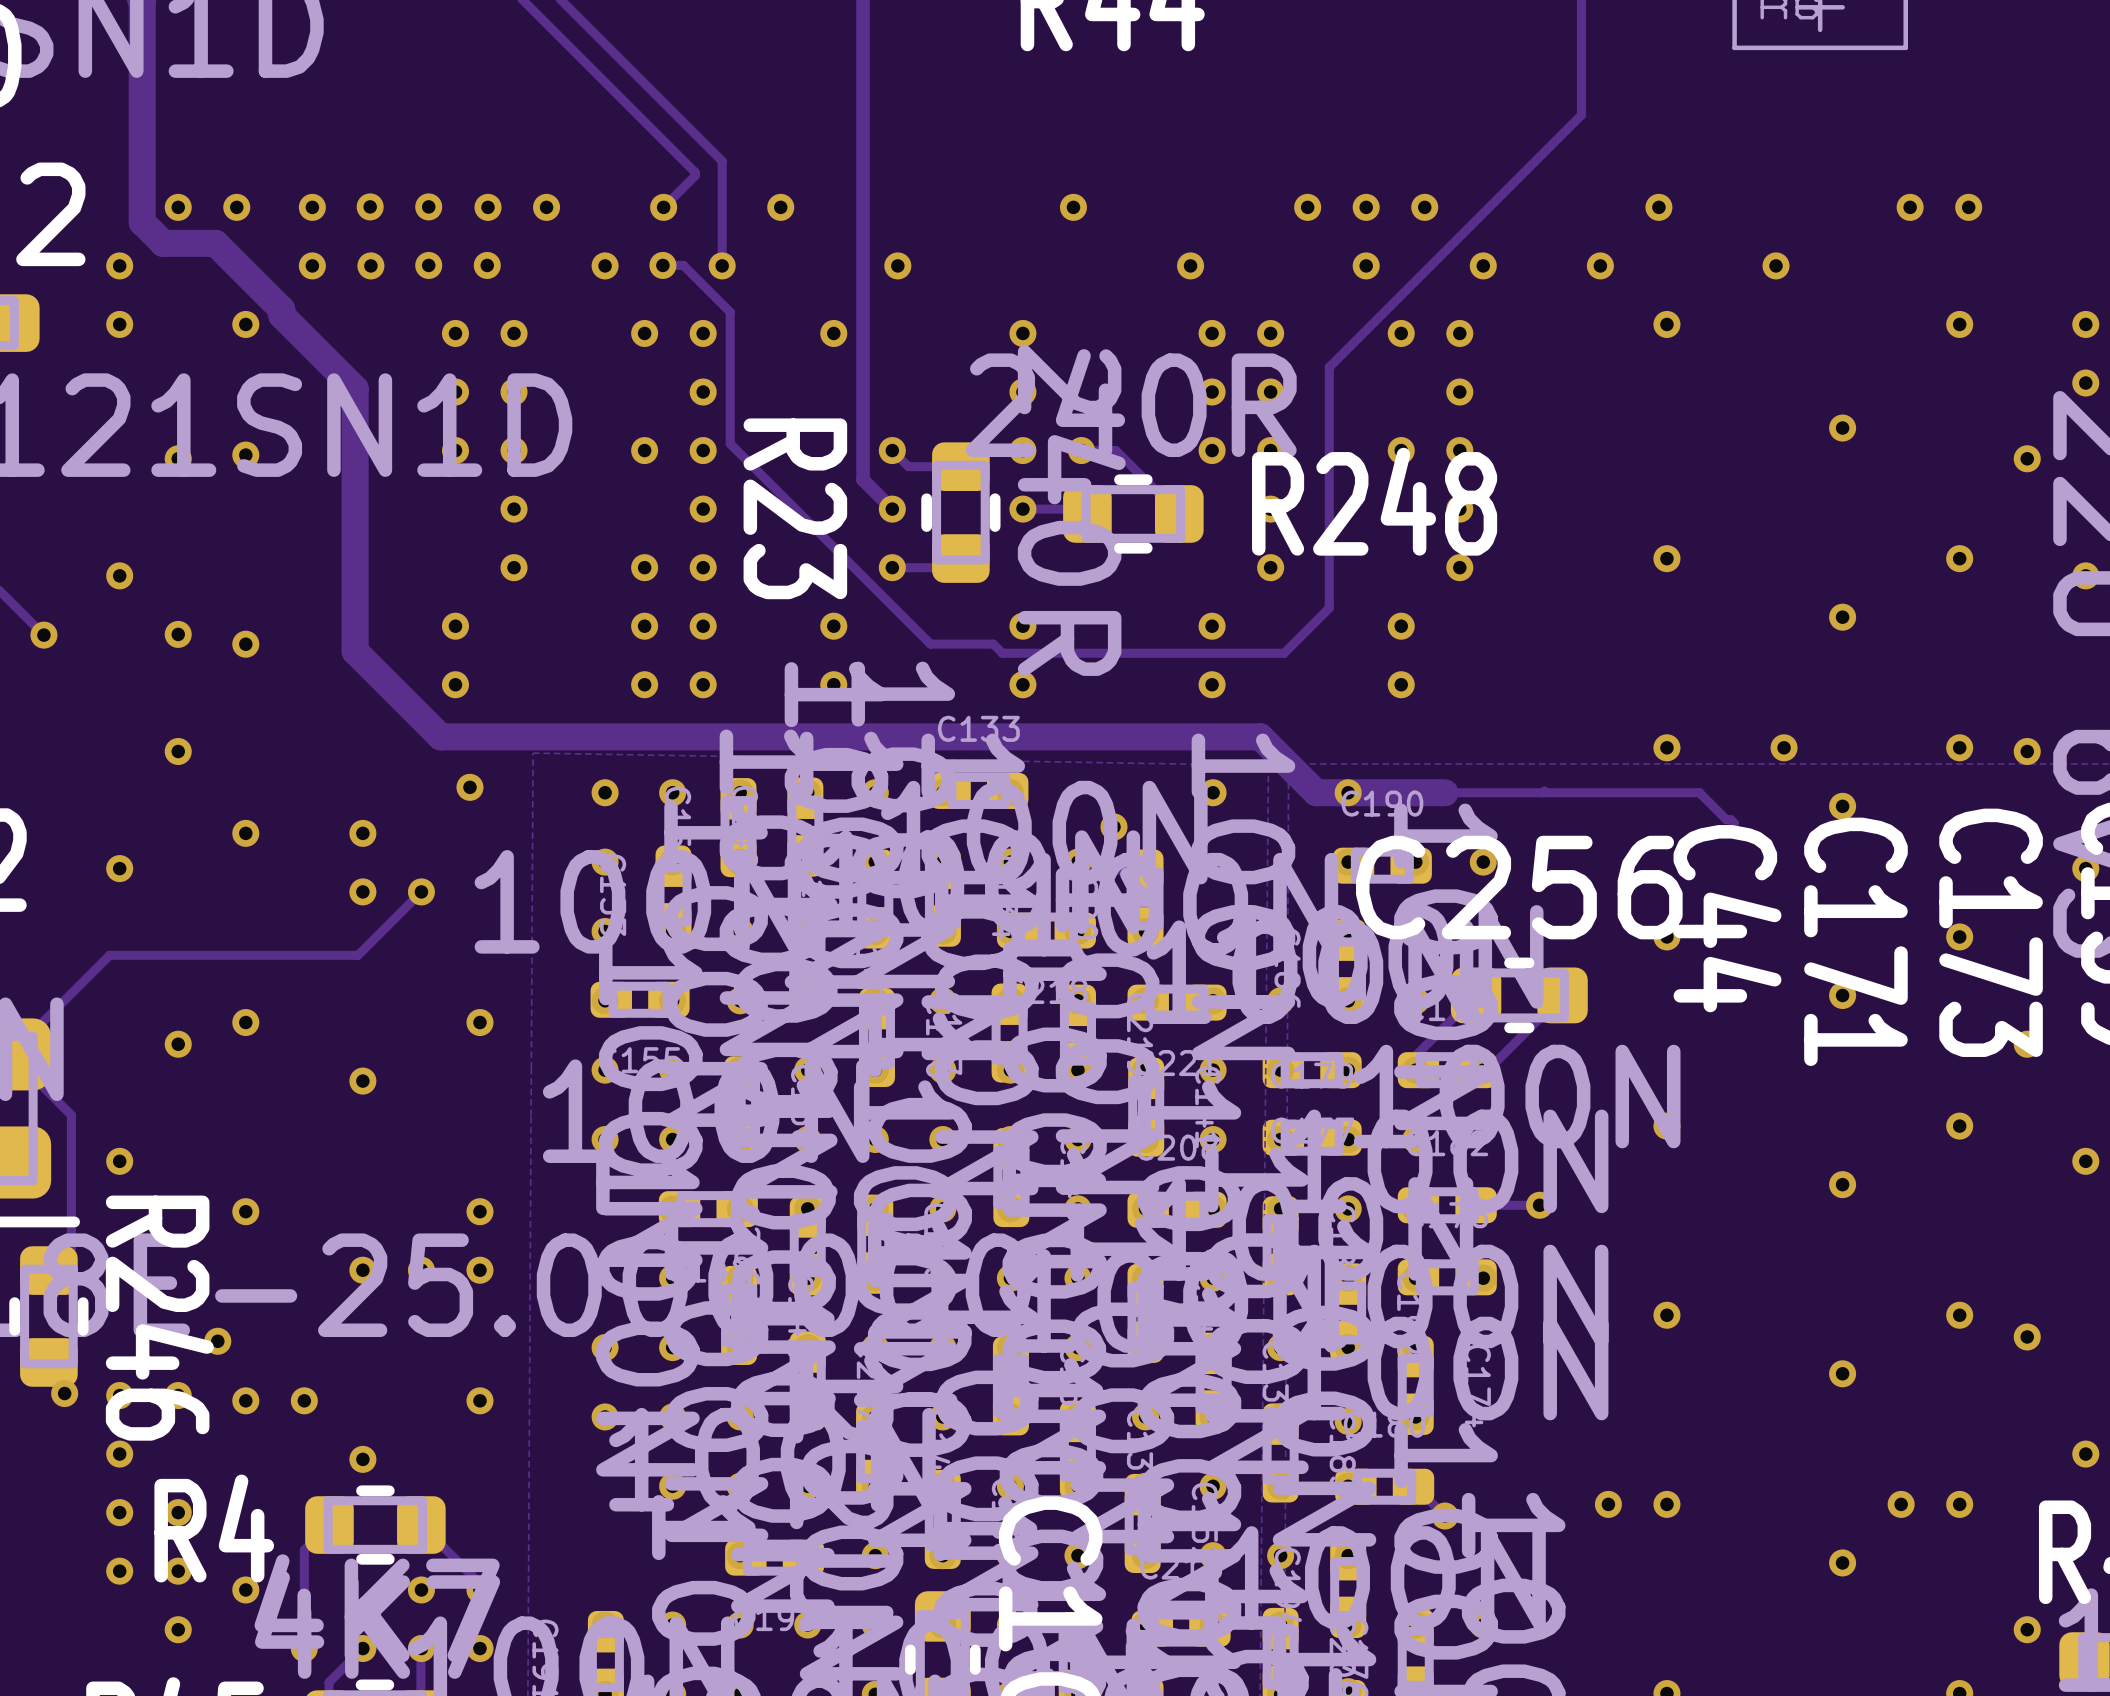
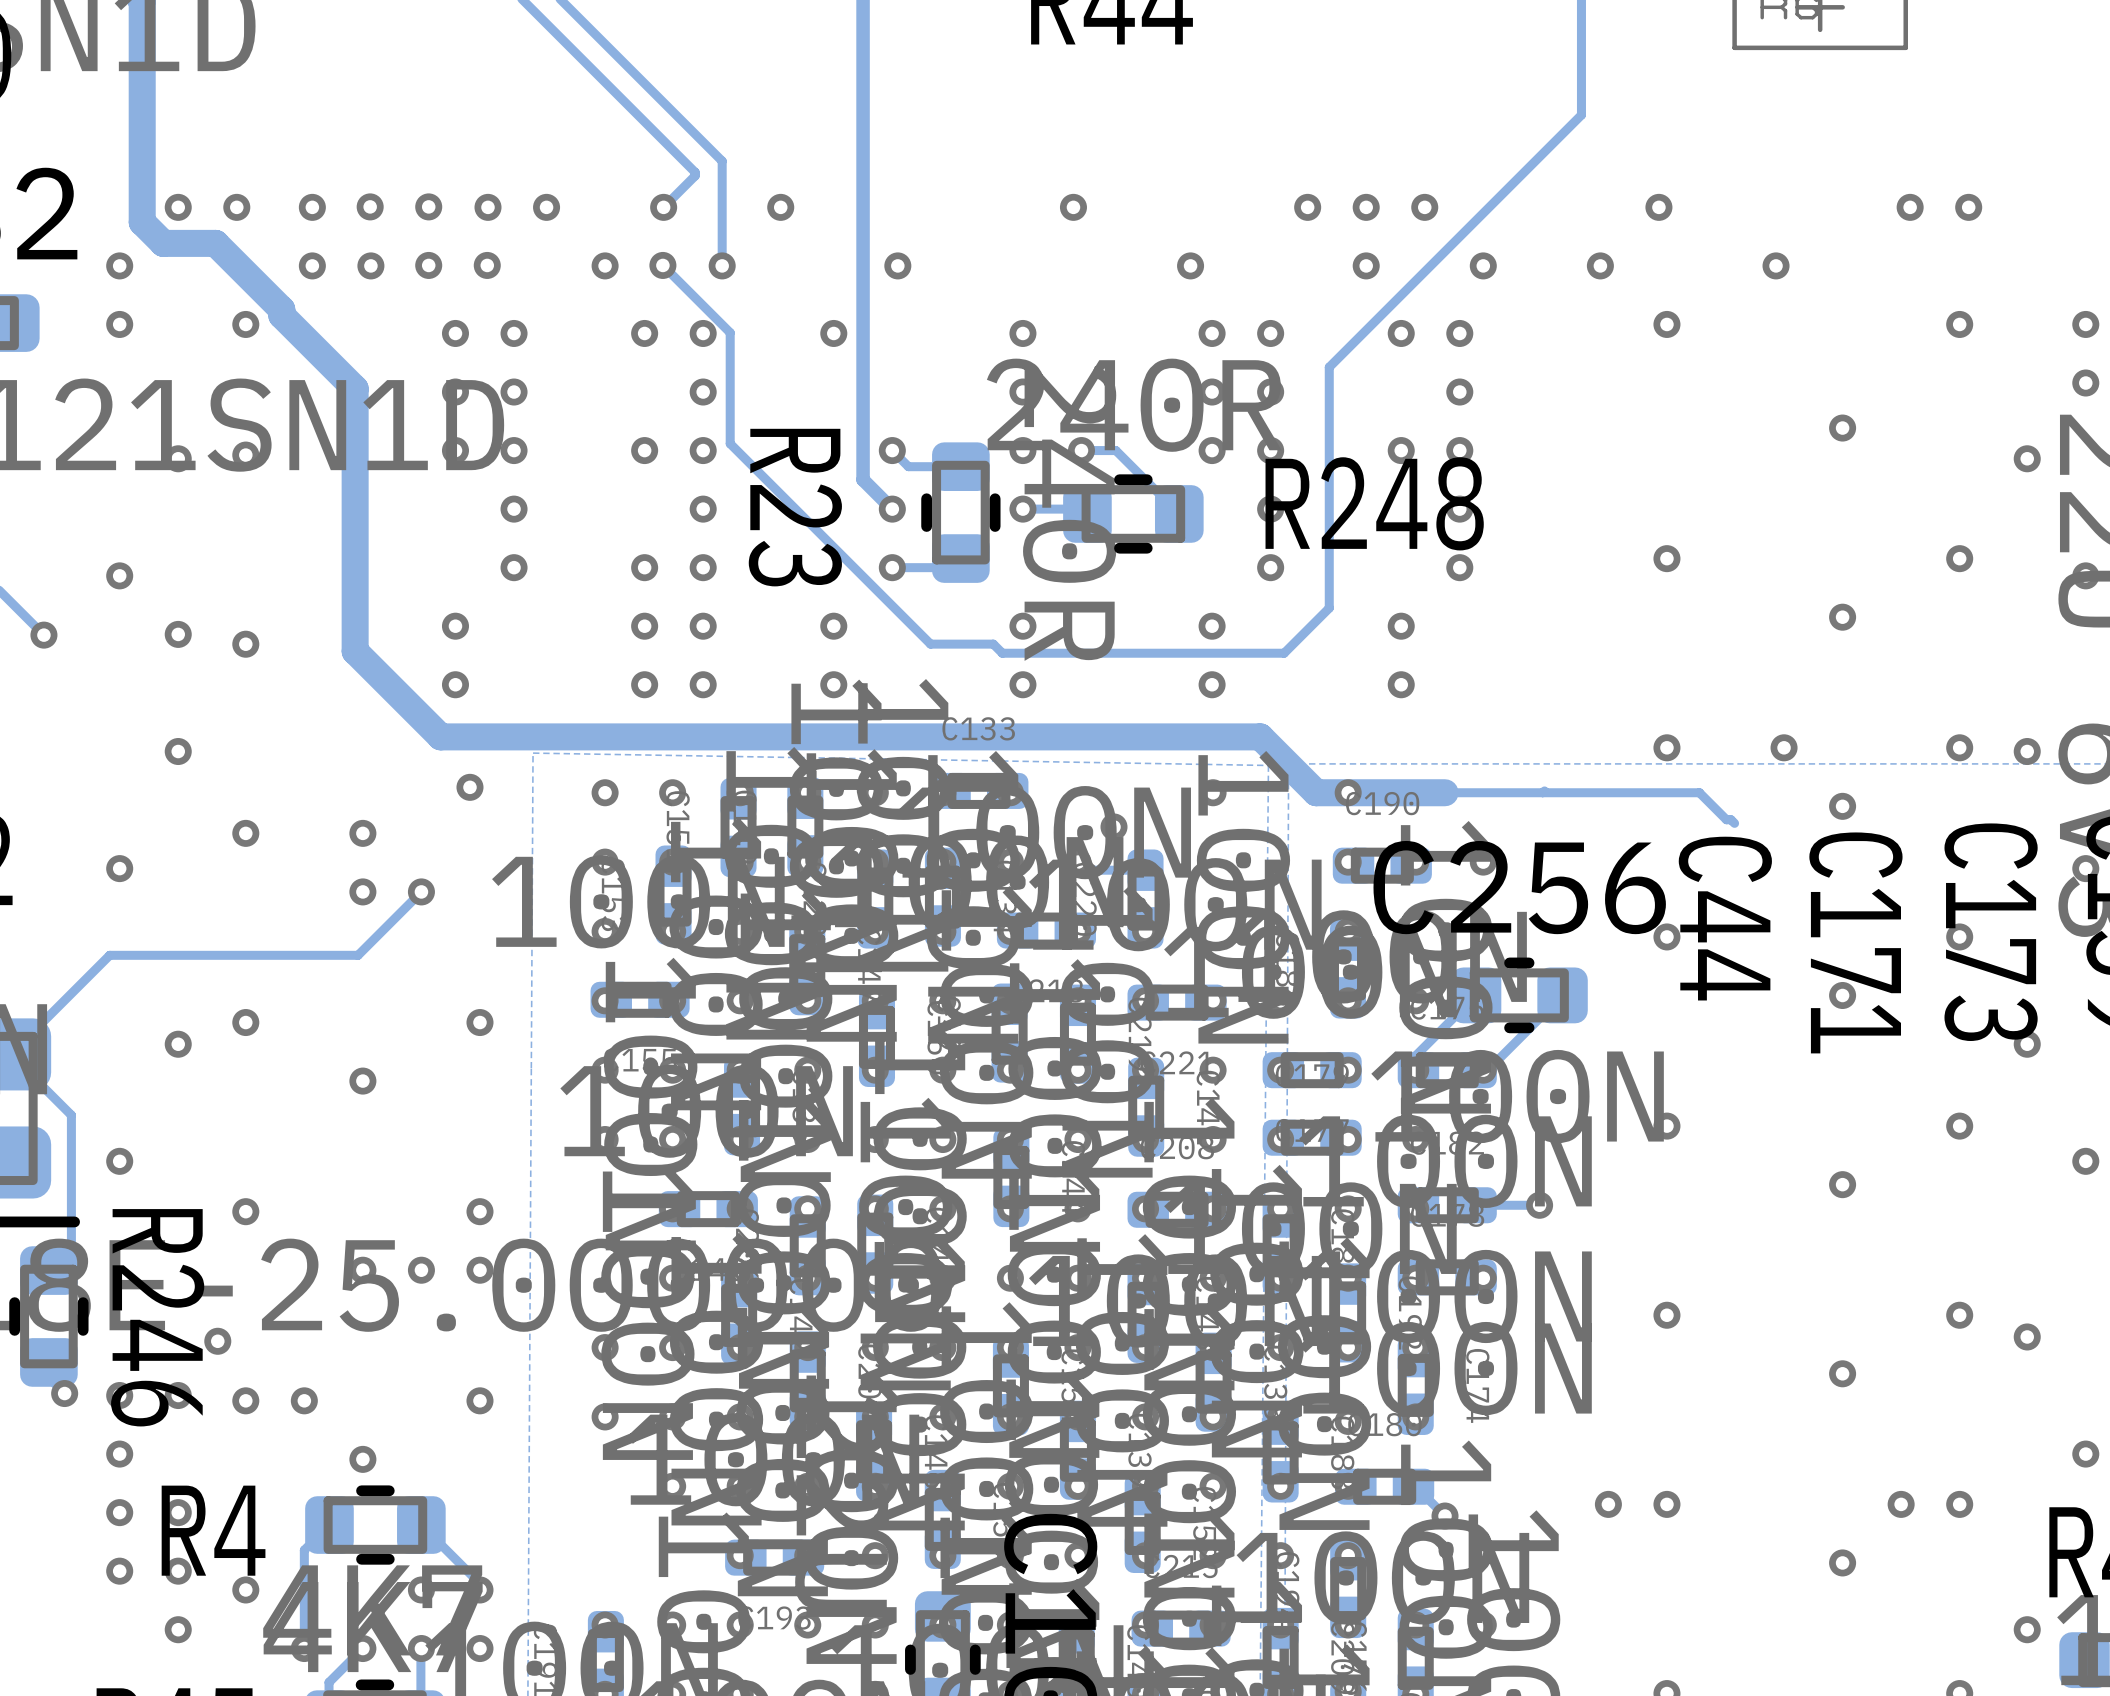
track: (662, 265) (683, 265) (730, 312) (730, 332) -> (662, 265) (730, 332)

